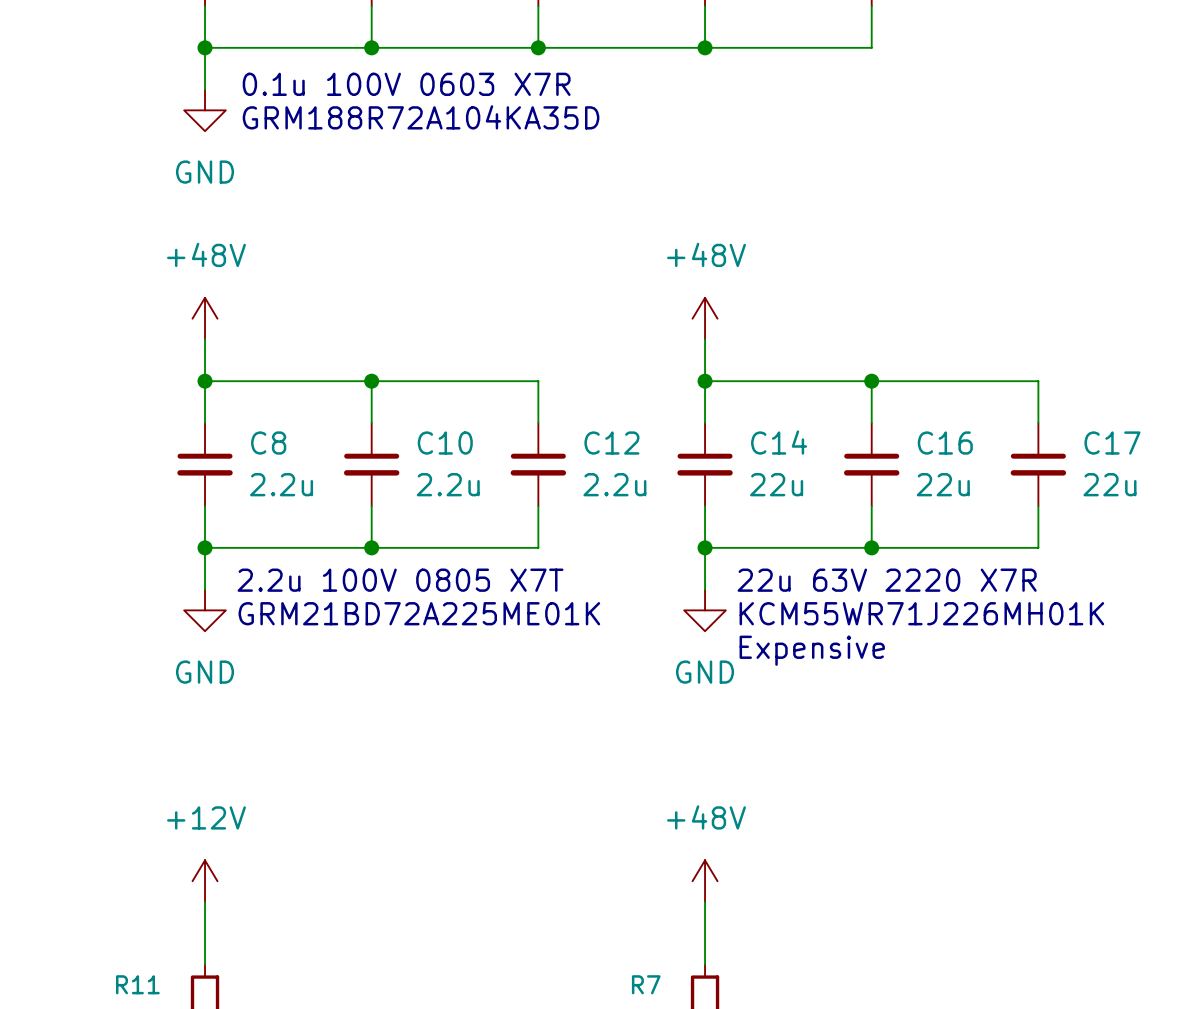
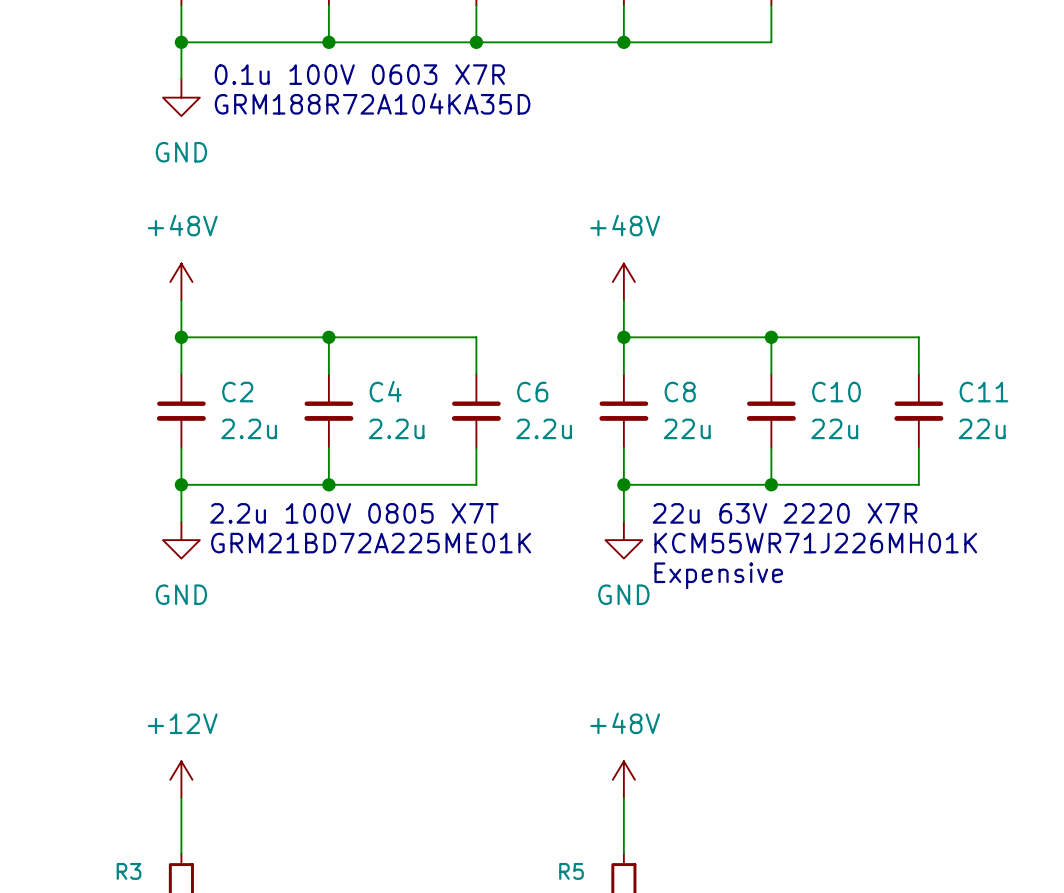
C14 name: C14 (779, 442) -> C8 (680, 392)
C8 name: C8 (268, 443) -> C2 (237, 392)
C10 name: C10 (445, 443) -> C4 (385, 391)
C12 name: C12 (611, 443) -> C6 (532, 392)
C16 name: C16 (945, 443) -> C10 (836, 392)
C17 name: C17 (1112, 443) -> C11 (983, 392)
R11 name: R11 (137, 984) -> R3 (129, 871)
R7 name: R7 (646, 984) -> R5 (571, 871)

